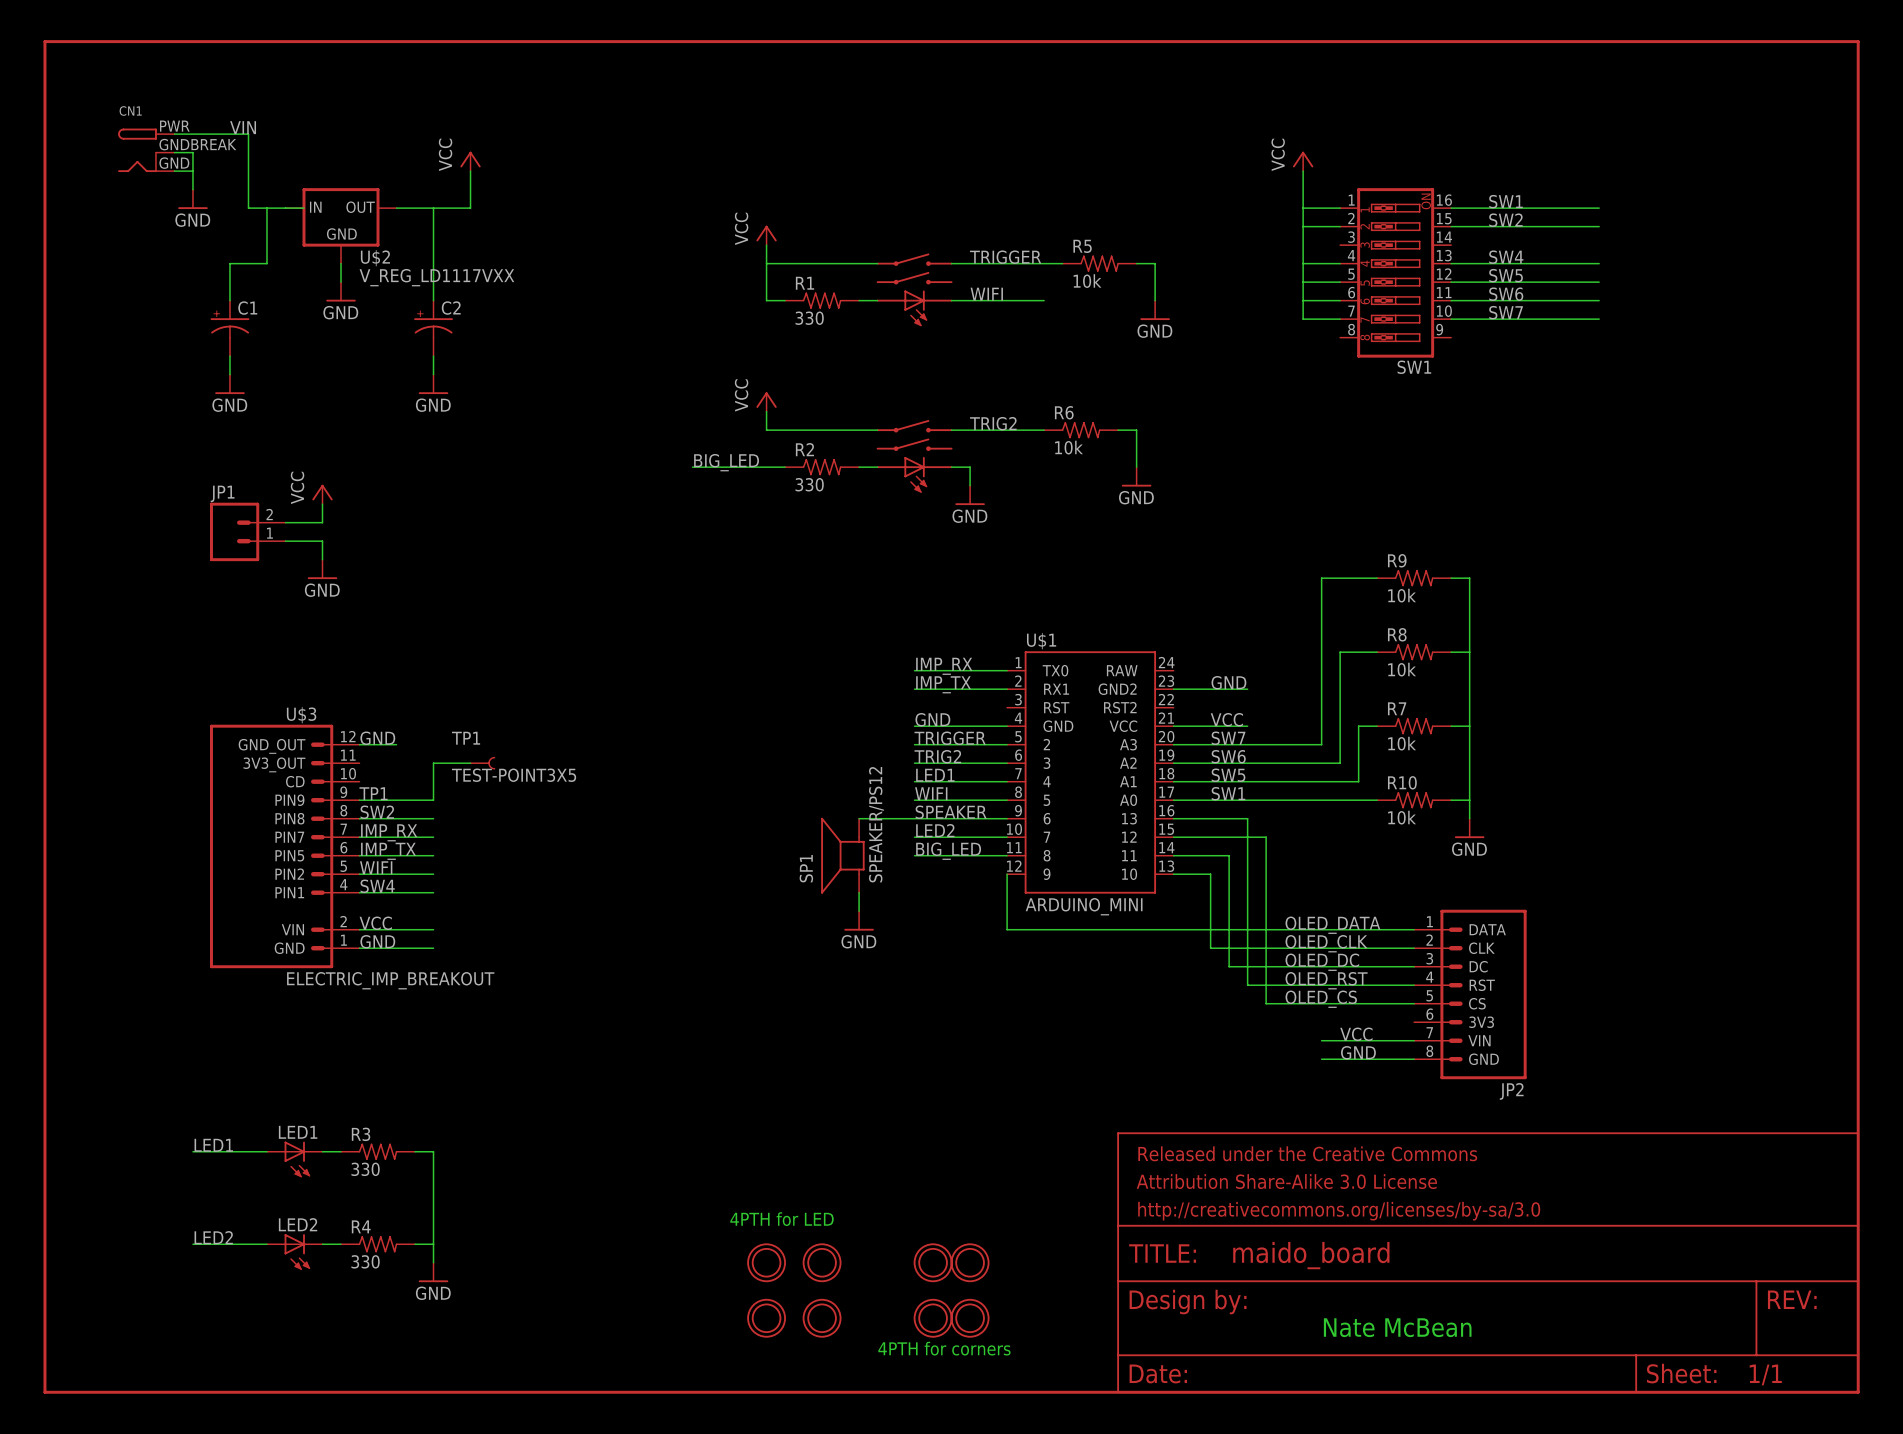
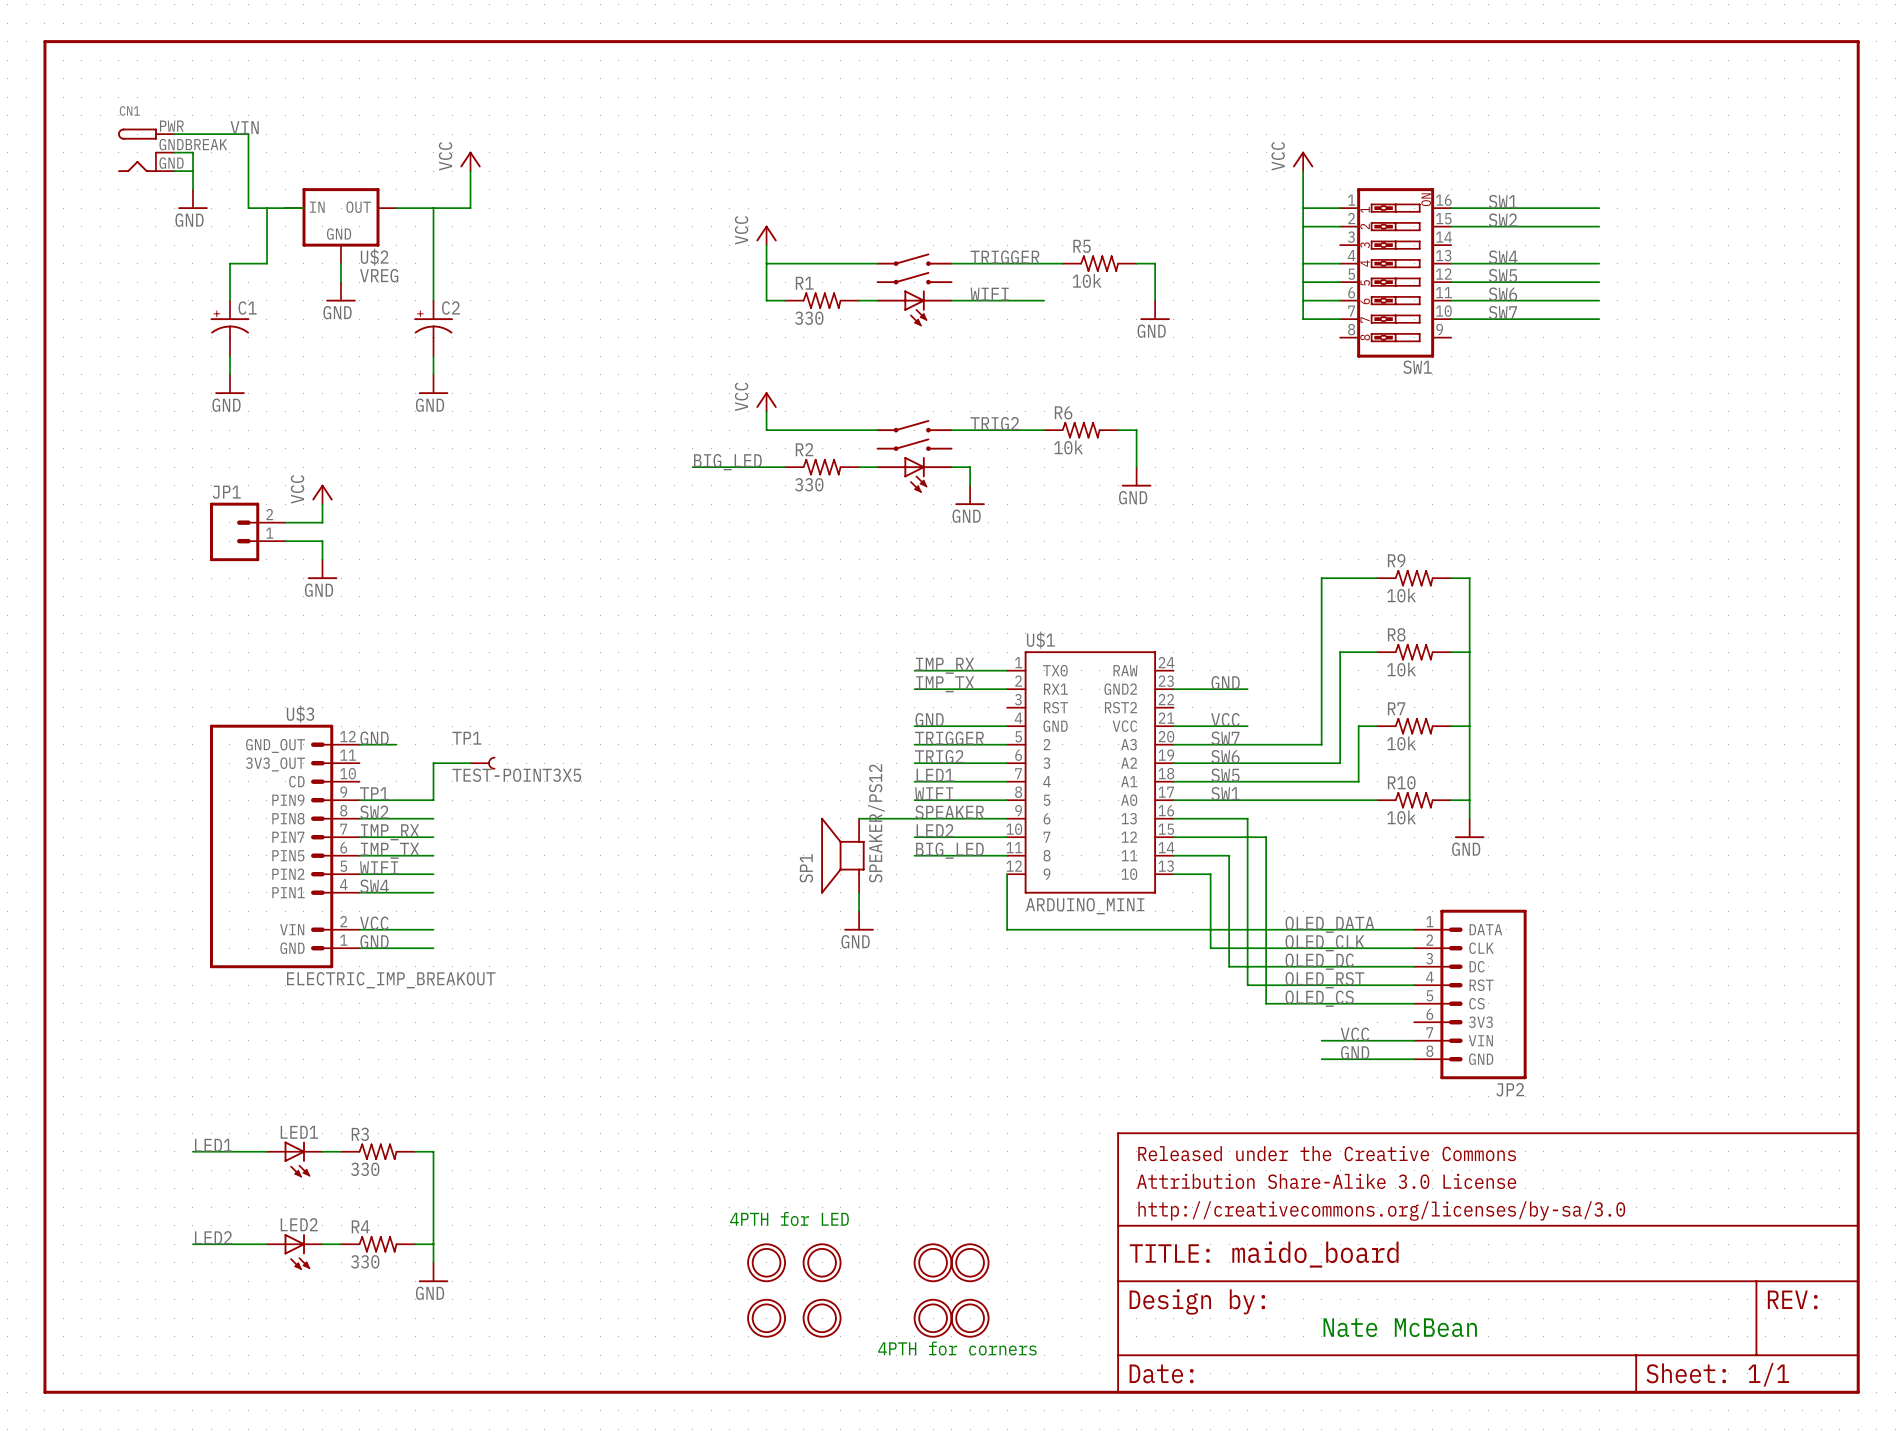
U$2 value: V_REG_LD1117VXX (436, 277) -> VREG (379, 275)

